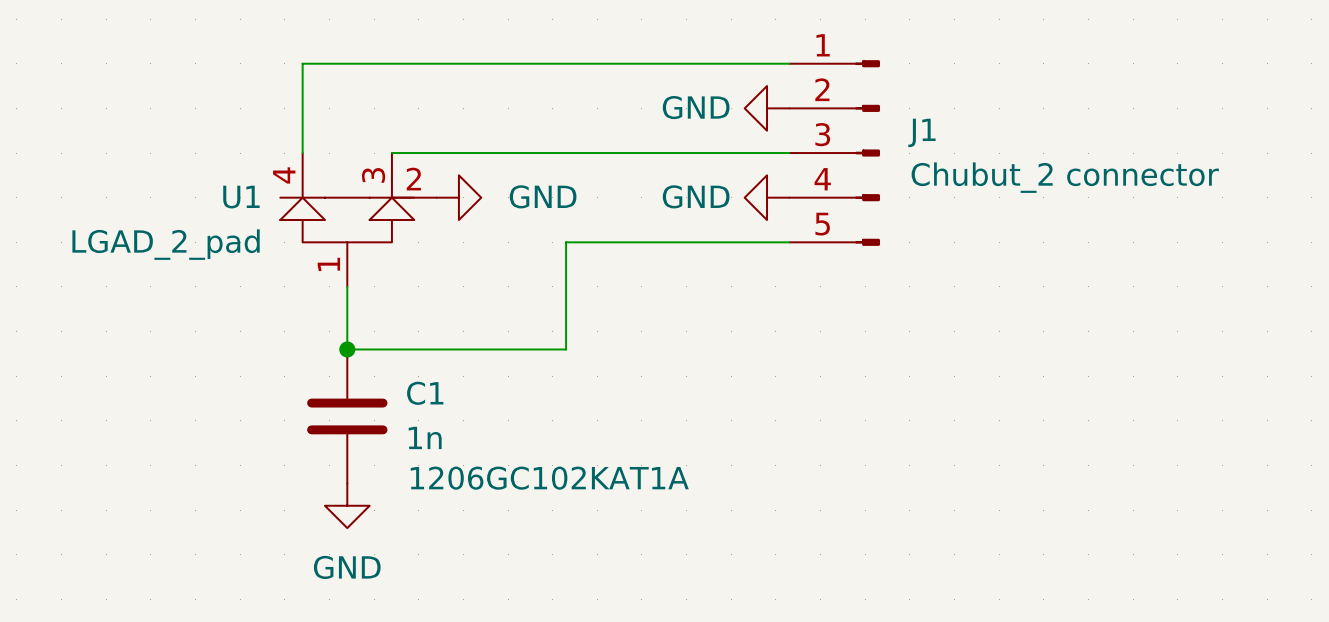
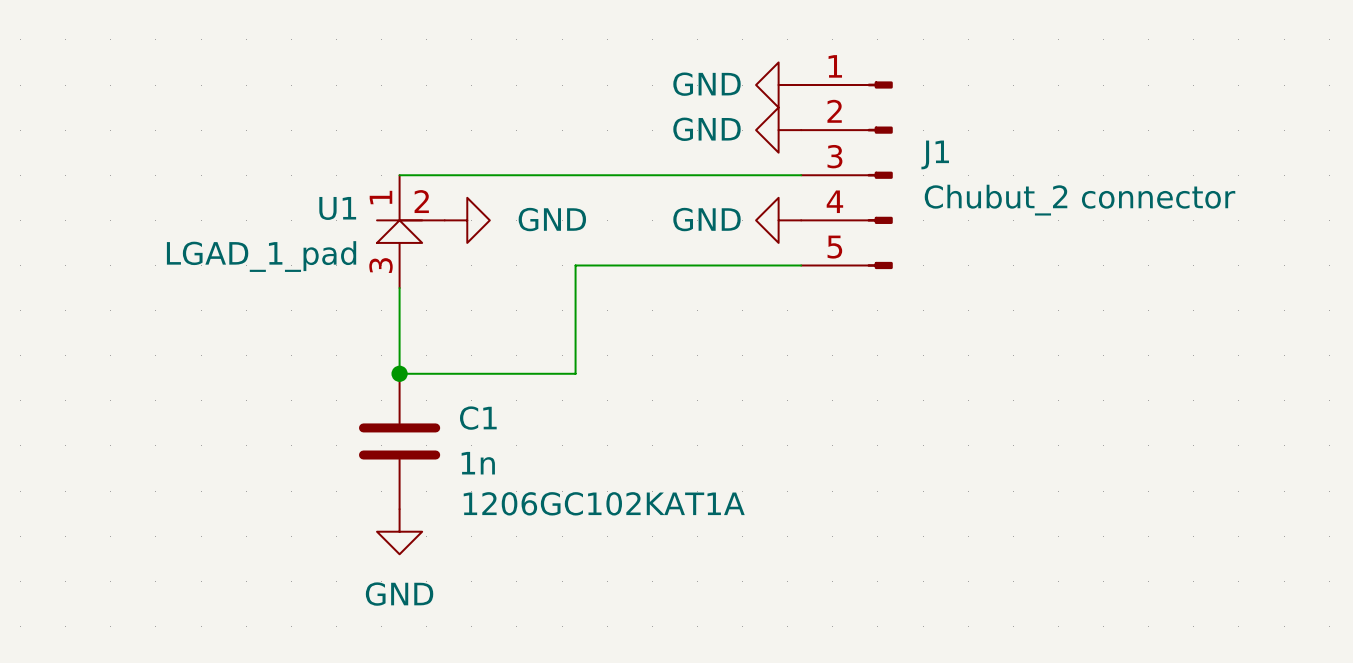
power symbol: none -> GND (778, 85)
wire: (789, 63) (302, 63) (302, 153) -> none
U1 symbol: [280, 153, 437, 287] -> [377, 175, 445, 289]
U1 name position: U1 (241, 197) -> U1 (337, 208)
U1 value: LGAD_2_pad (166, 244) -> LGAD_1_pad (261, 256)
wire: (347, 286) (347, 349) (391, 349) -> (399, 288) (399, 373)
junction position: (347, 349) -> (399, 373)
C1 position: (347, 416) -> (399, 441)
power symbol position: GND (347, 505) -> GND (399, 531)

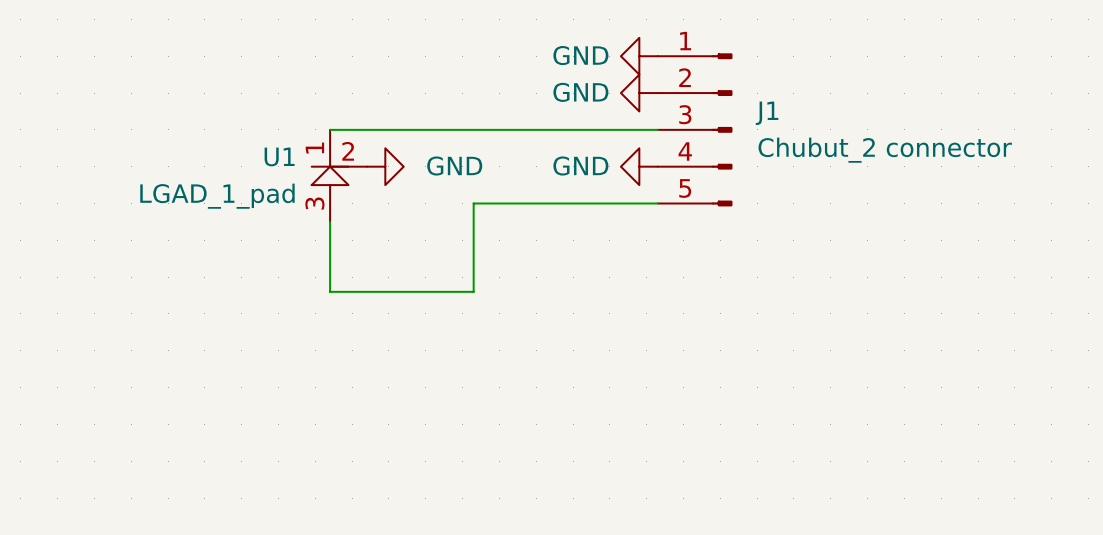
junction: (399, 373) -> none
C1: 1n (399, 441) -> none
power symbol: GND (399, 531) -> none

